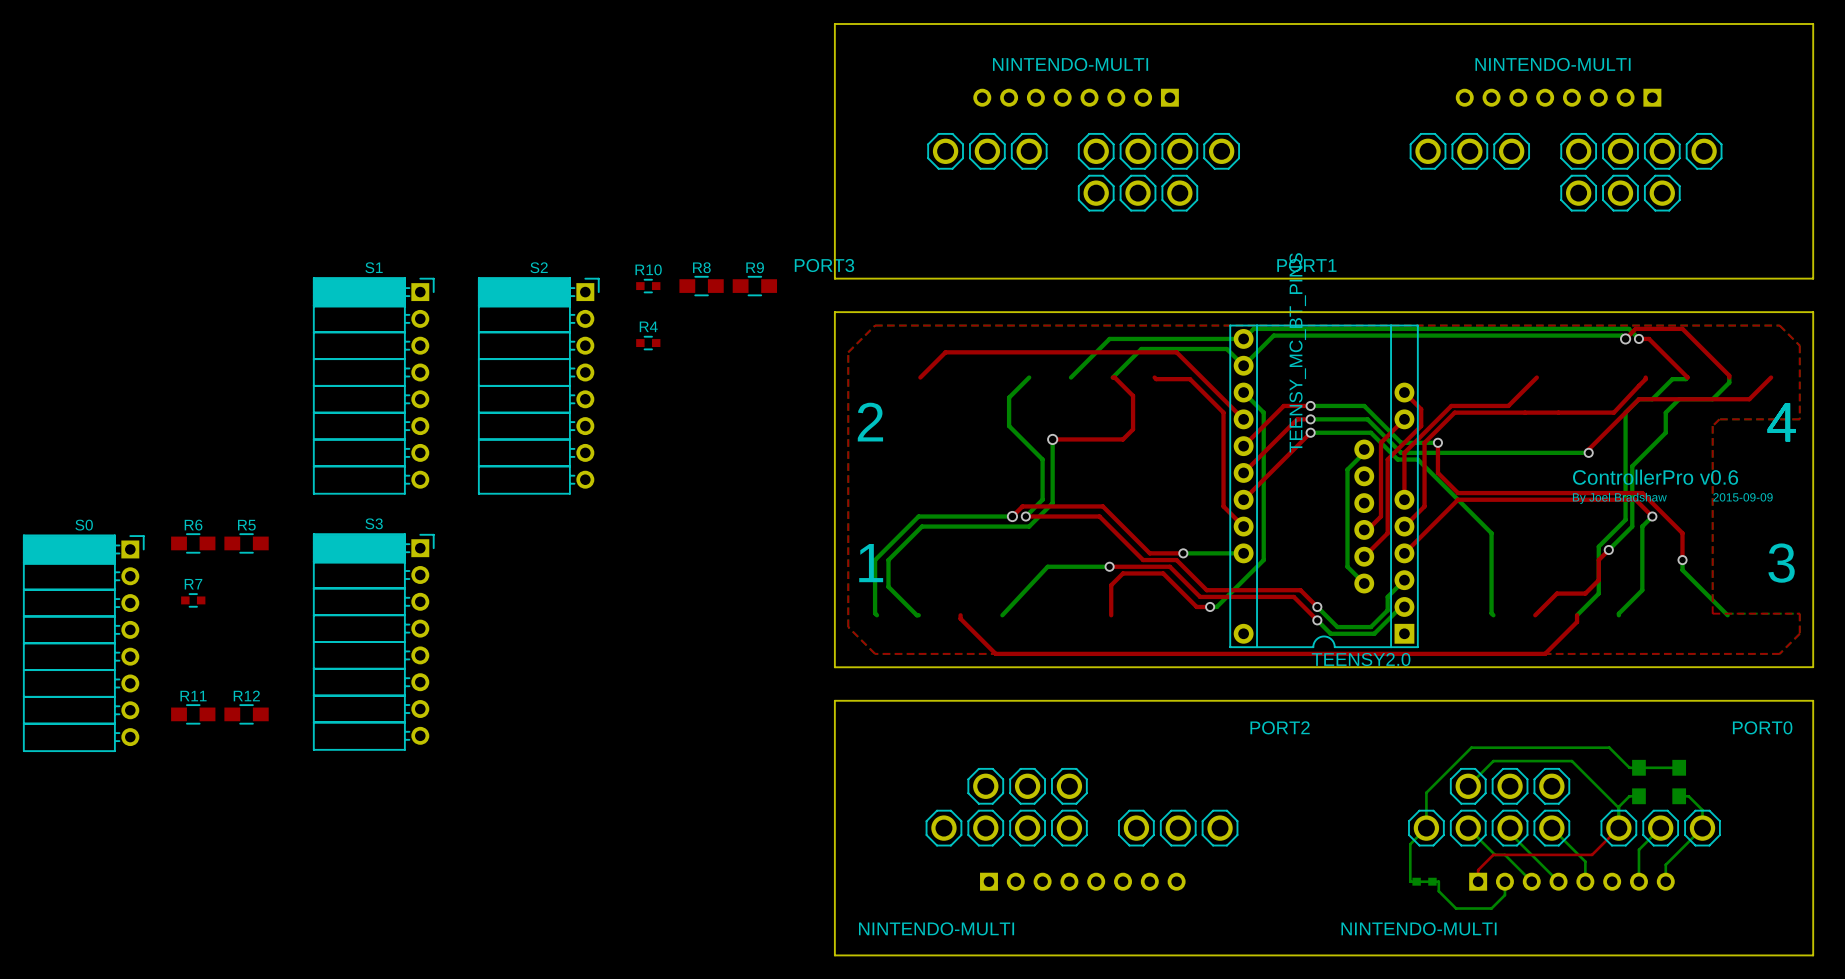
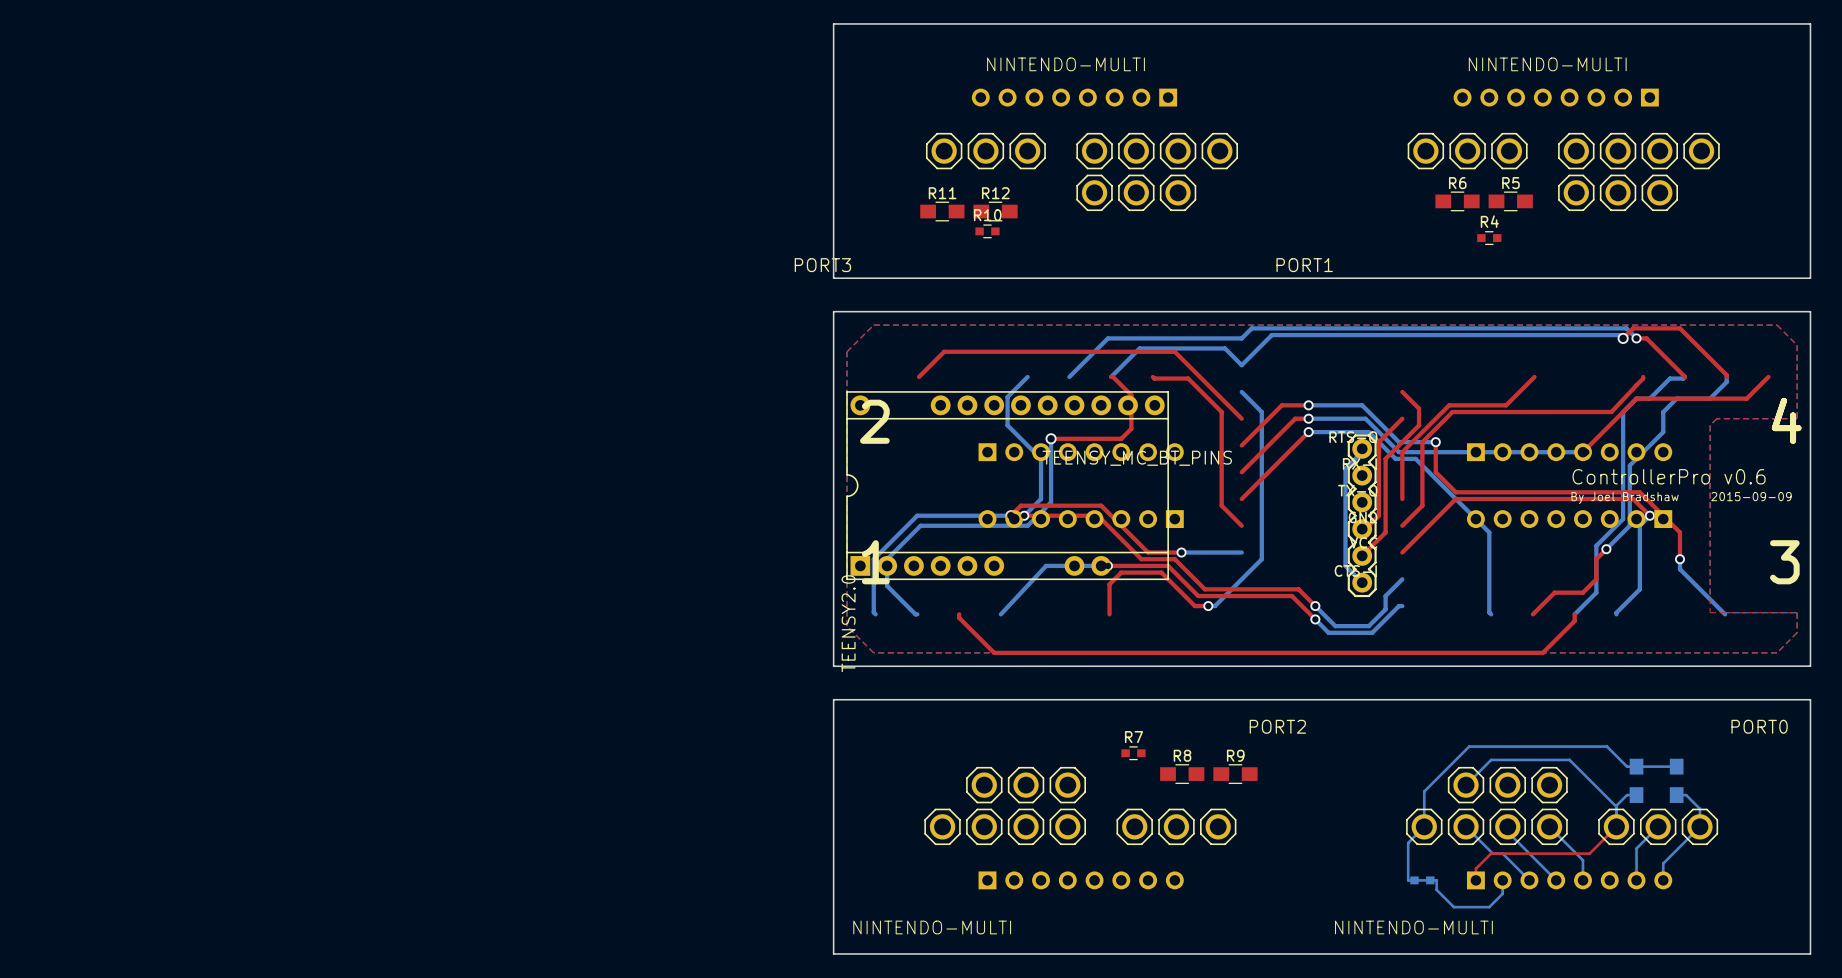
R10 position: (648, 286) -> (987, 231)
R8 position: (701, 286) -> (1182, 774)
R9 position: (754, 286) -> (1235, 774)
R4 position: (648, 343) -> (1489, 238)
S1: (373, 385) -> none
S2: (538, 385) -> none
part: none -> (1081, 452)
part: none -> (1569, 452)
TEENSY2.0 rotation: 0° (1324, 486) -> 90° clockwise (1007, 485)
TEENSY2.0 position: (1324, 486) -> (1007, 485)
part side: bottom (1364, 516) -> top (1362, 515)
part: none -> (1081, 519)
part: none -> (1569, 519)
R6 position: (193, 543) -> (1457, 201)
R5 position: (246, 543) -> (1510, 201)
R7 position: (193, 600) -> (1133, 753)
S3: (373, 642) -> none
S0: (83, 643) -> none
TEENSY2.0 name position: TEENSY2.0 (1361, 659) -> TEENSY2.0 (848, 623)
R11 position: (193, 714) -> (942, 211)
R12 position: (246, 714) -> (995, 211)

